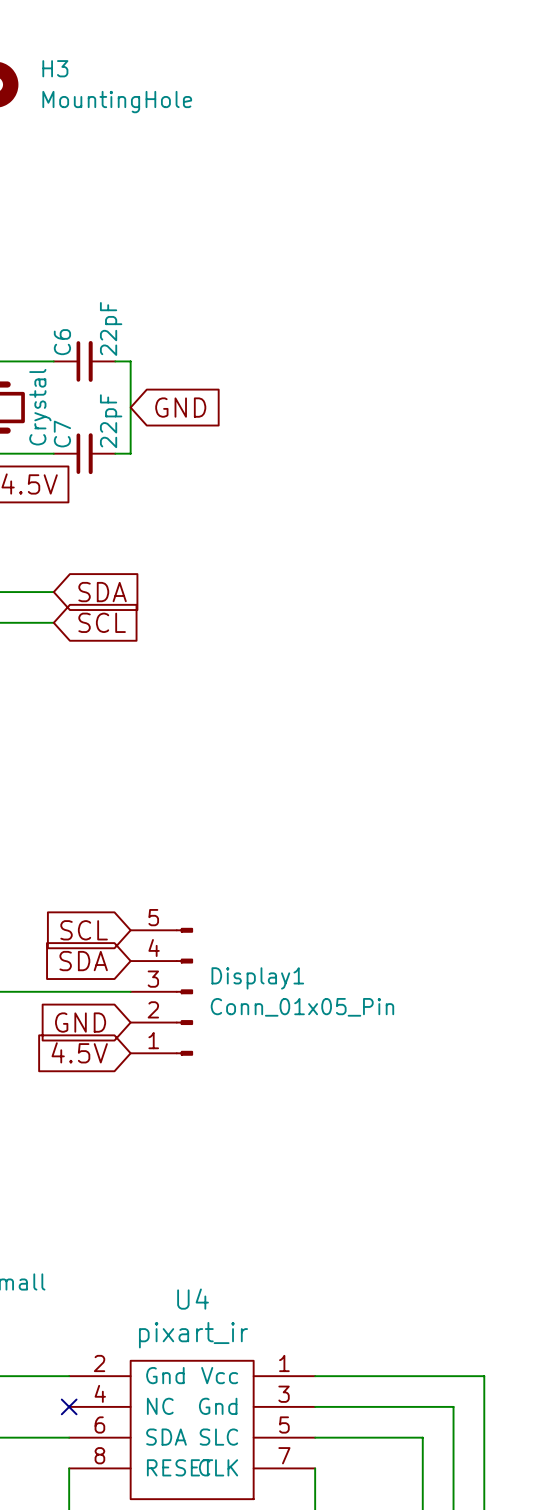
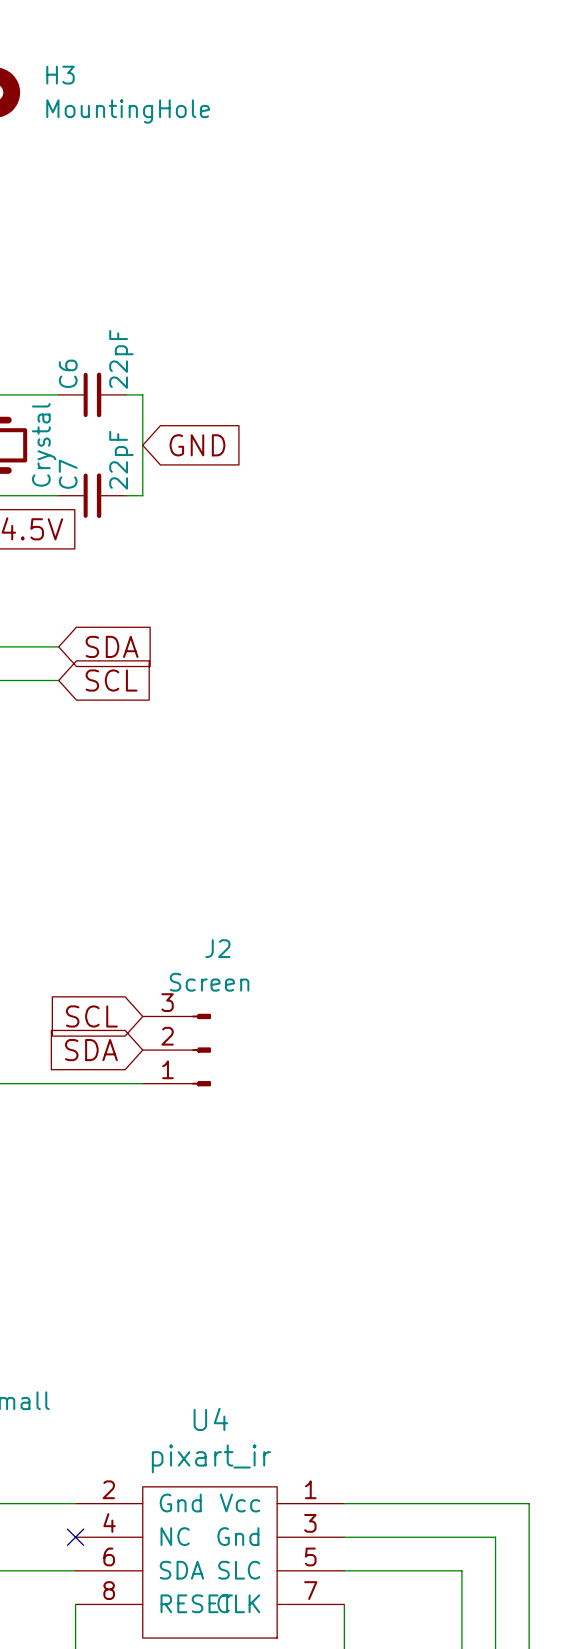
J2: none -> Screen (176, 1050)
Display1: Conn_01x05_Pin (161, 991) -> none
global label: GND (80, 1022) -> none
global label: 4.5V (79, 1052) -> none

